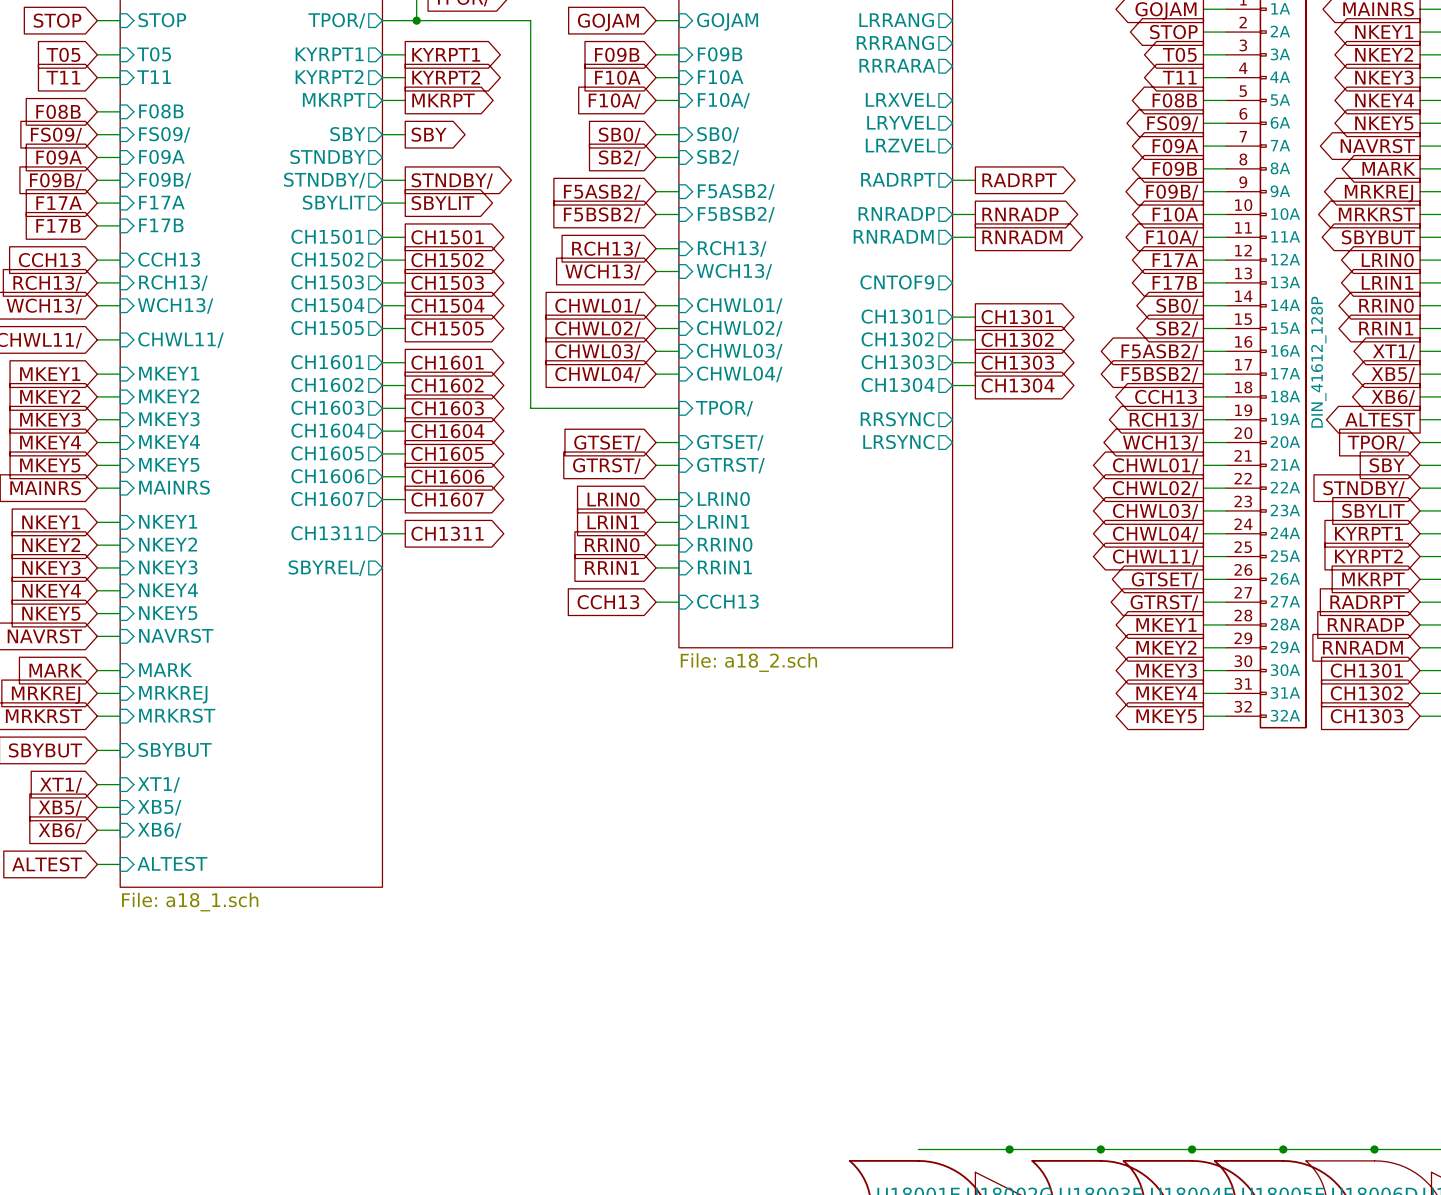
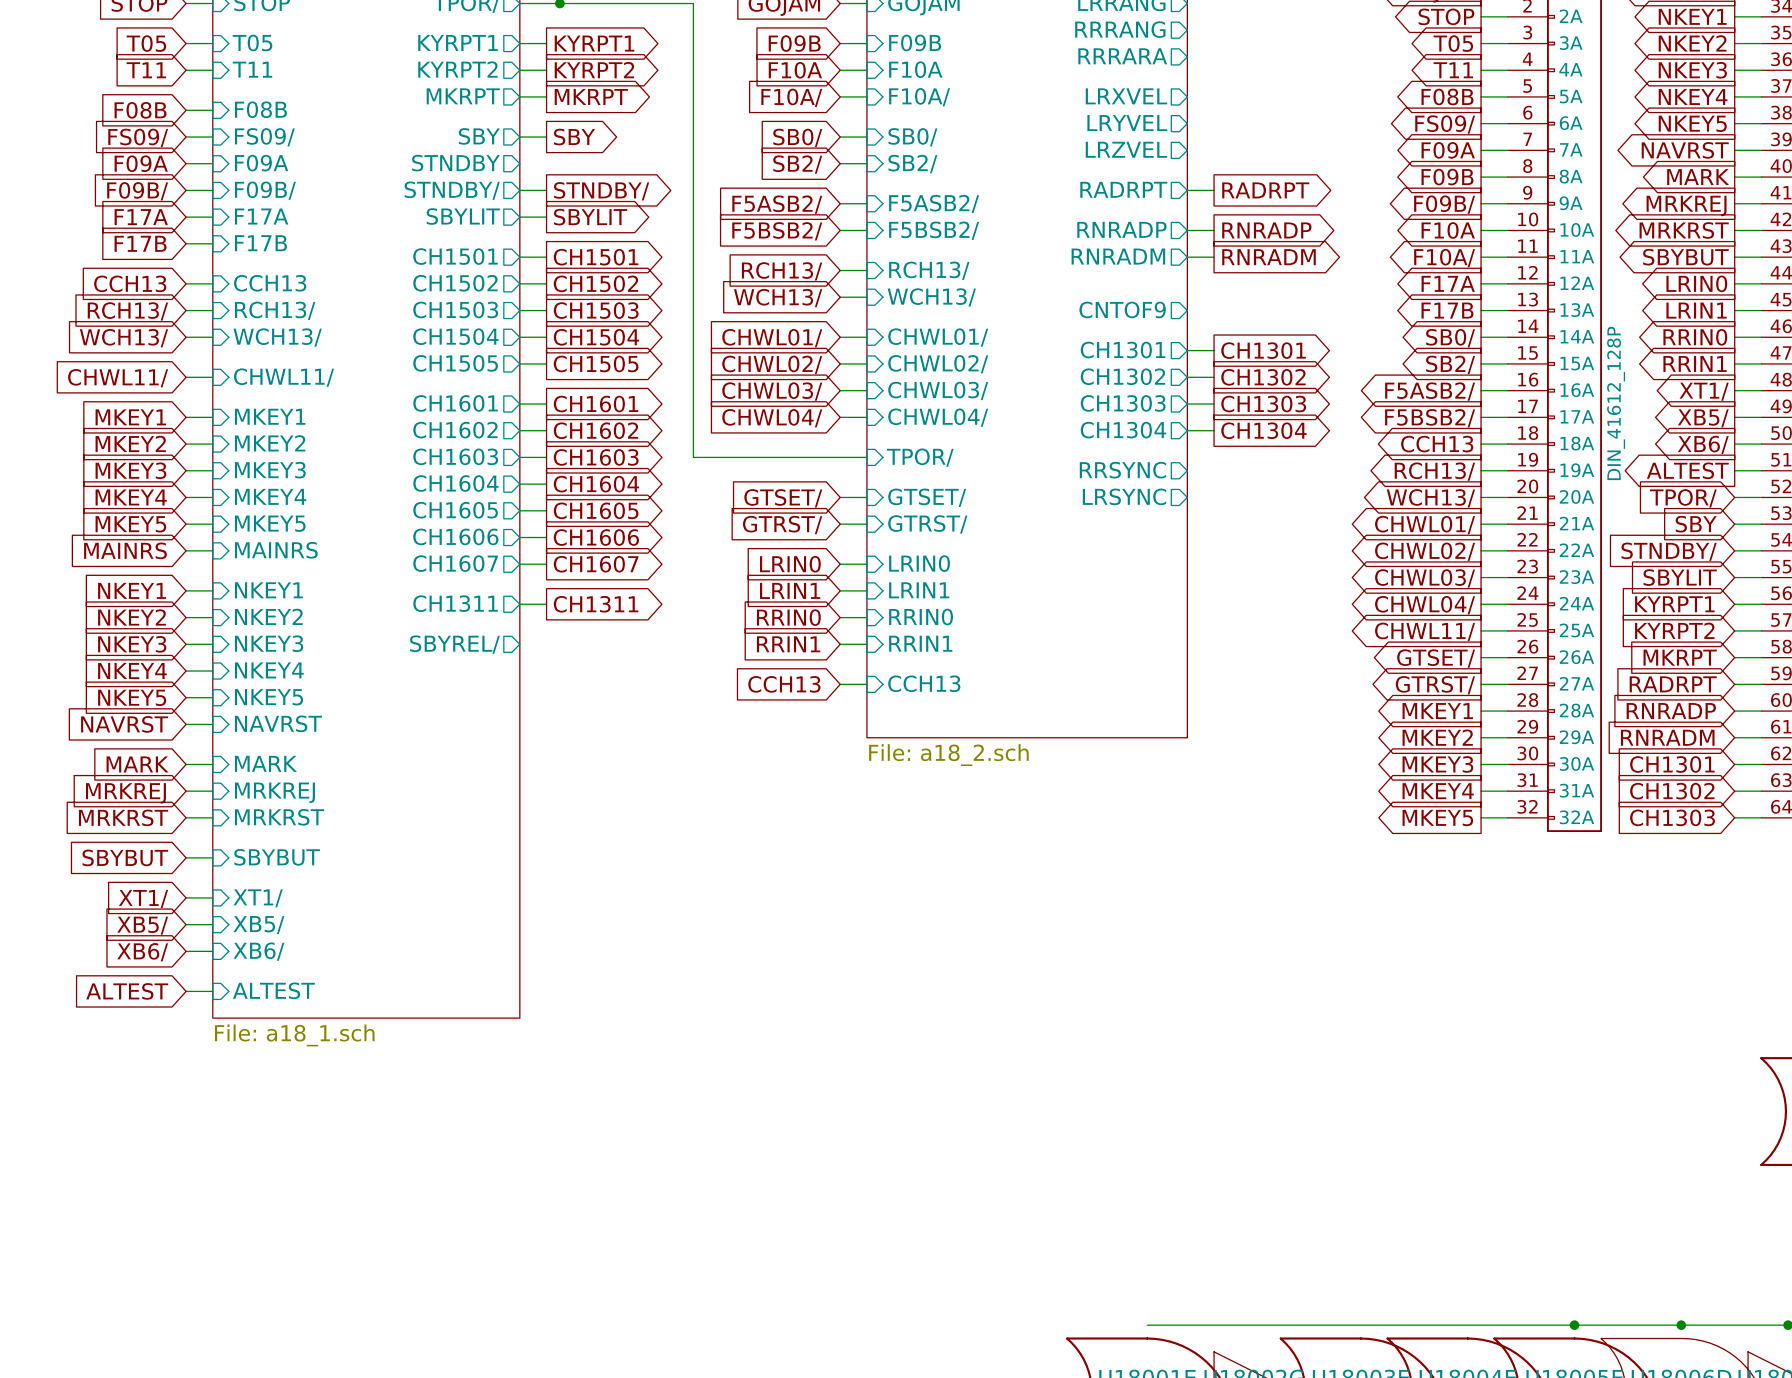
junction: (1009, 1149) -> none
junction: (1100, 1149) -> none
junction: (1192, 1149) -> none

